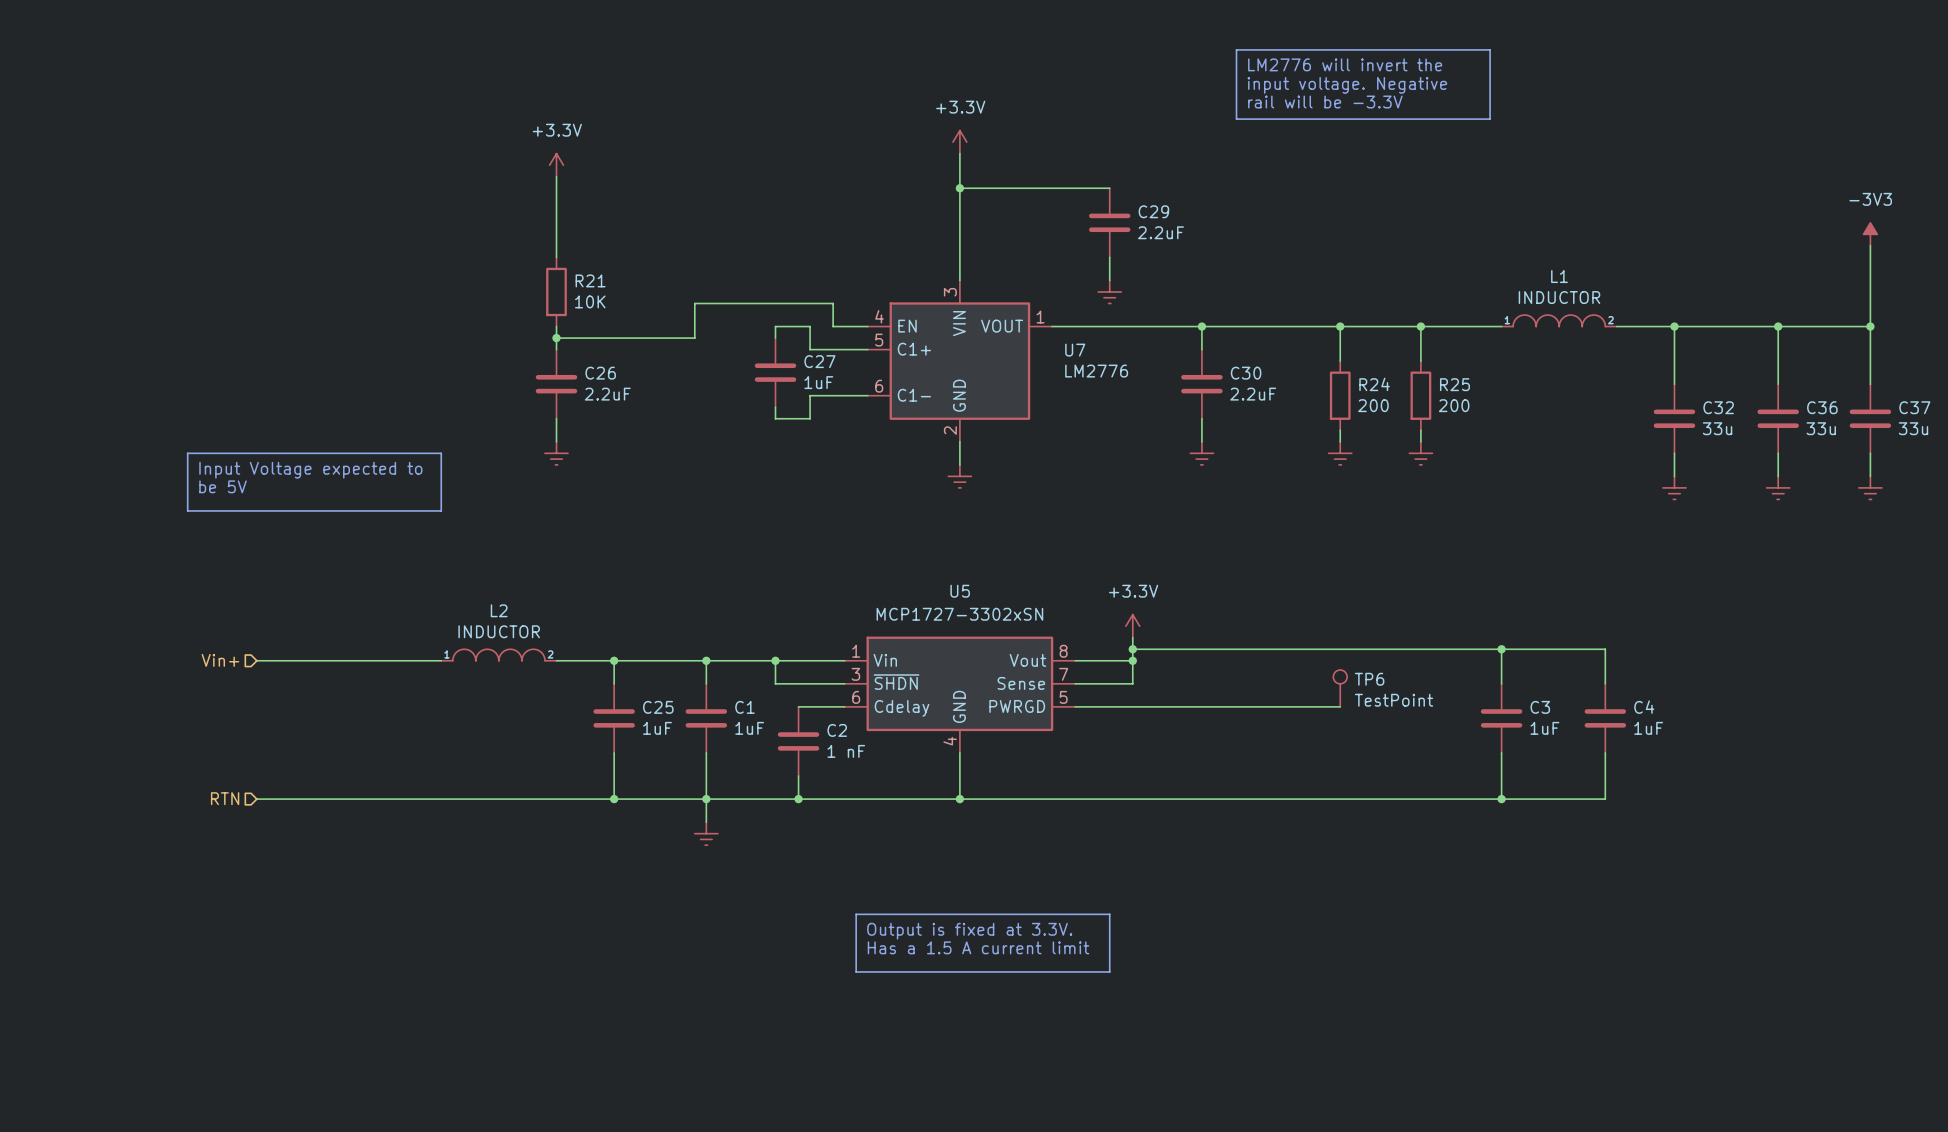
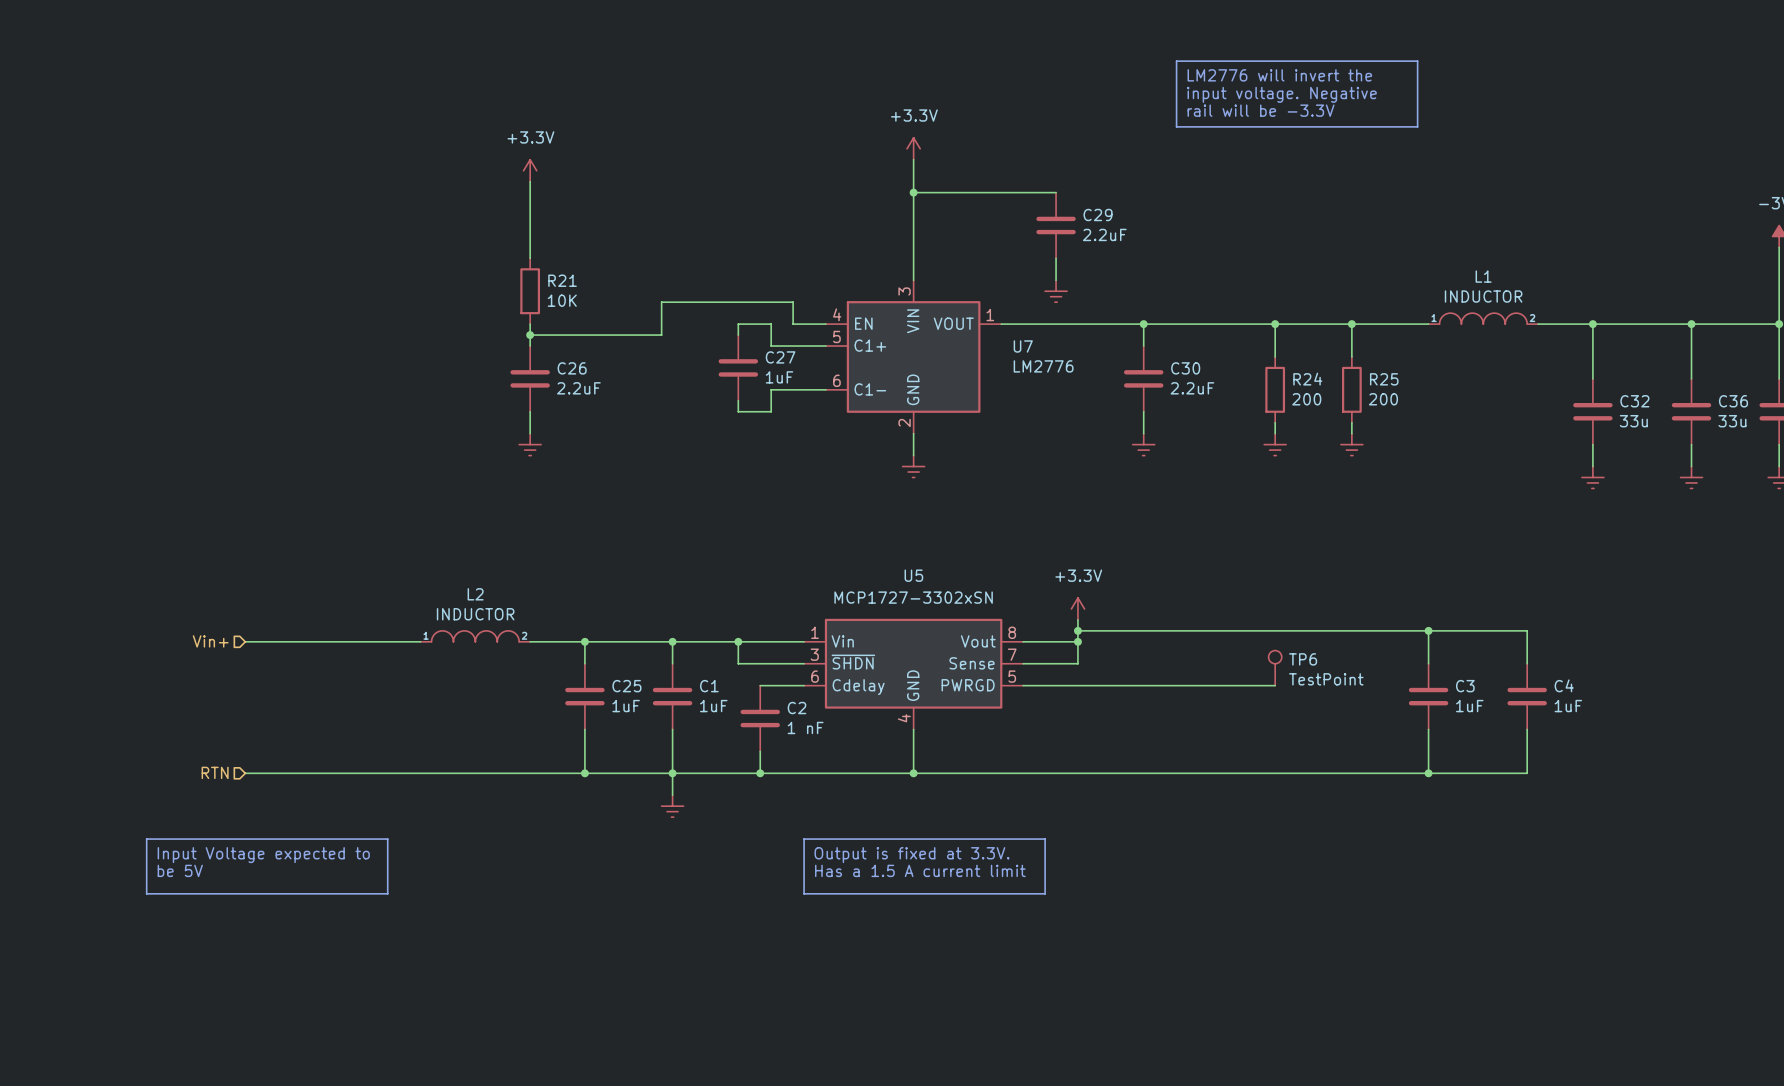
line: (187, 453) (441, 453) (441, 510) (187, 510) (187, 453) -> none
text: Input Voltage expected to (310, 470) -> none
text: be 5V (223, 486) -> none
line: none -> (146, 839) (387, 839) (387, 893) (146, 893) (146, 839)
text: none -> Input Voltage expected to (263, 855)
text: none -> be 5V (180, 870)
line: (856, 914) (1109, 914) (1109, 971) (856, 971) (856, 914) -> (804, 839) (1045, 839) (1045, 893) (804, 893) (804, 839)
text position: Output is fixed at 3.3V. (969, 931) -> Output is fixed at 3.3V. (912, 855)
text position: Has a 1.5 A current limit (978, 947) -> Has a 1.5 A current limit (920, 870)

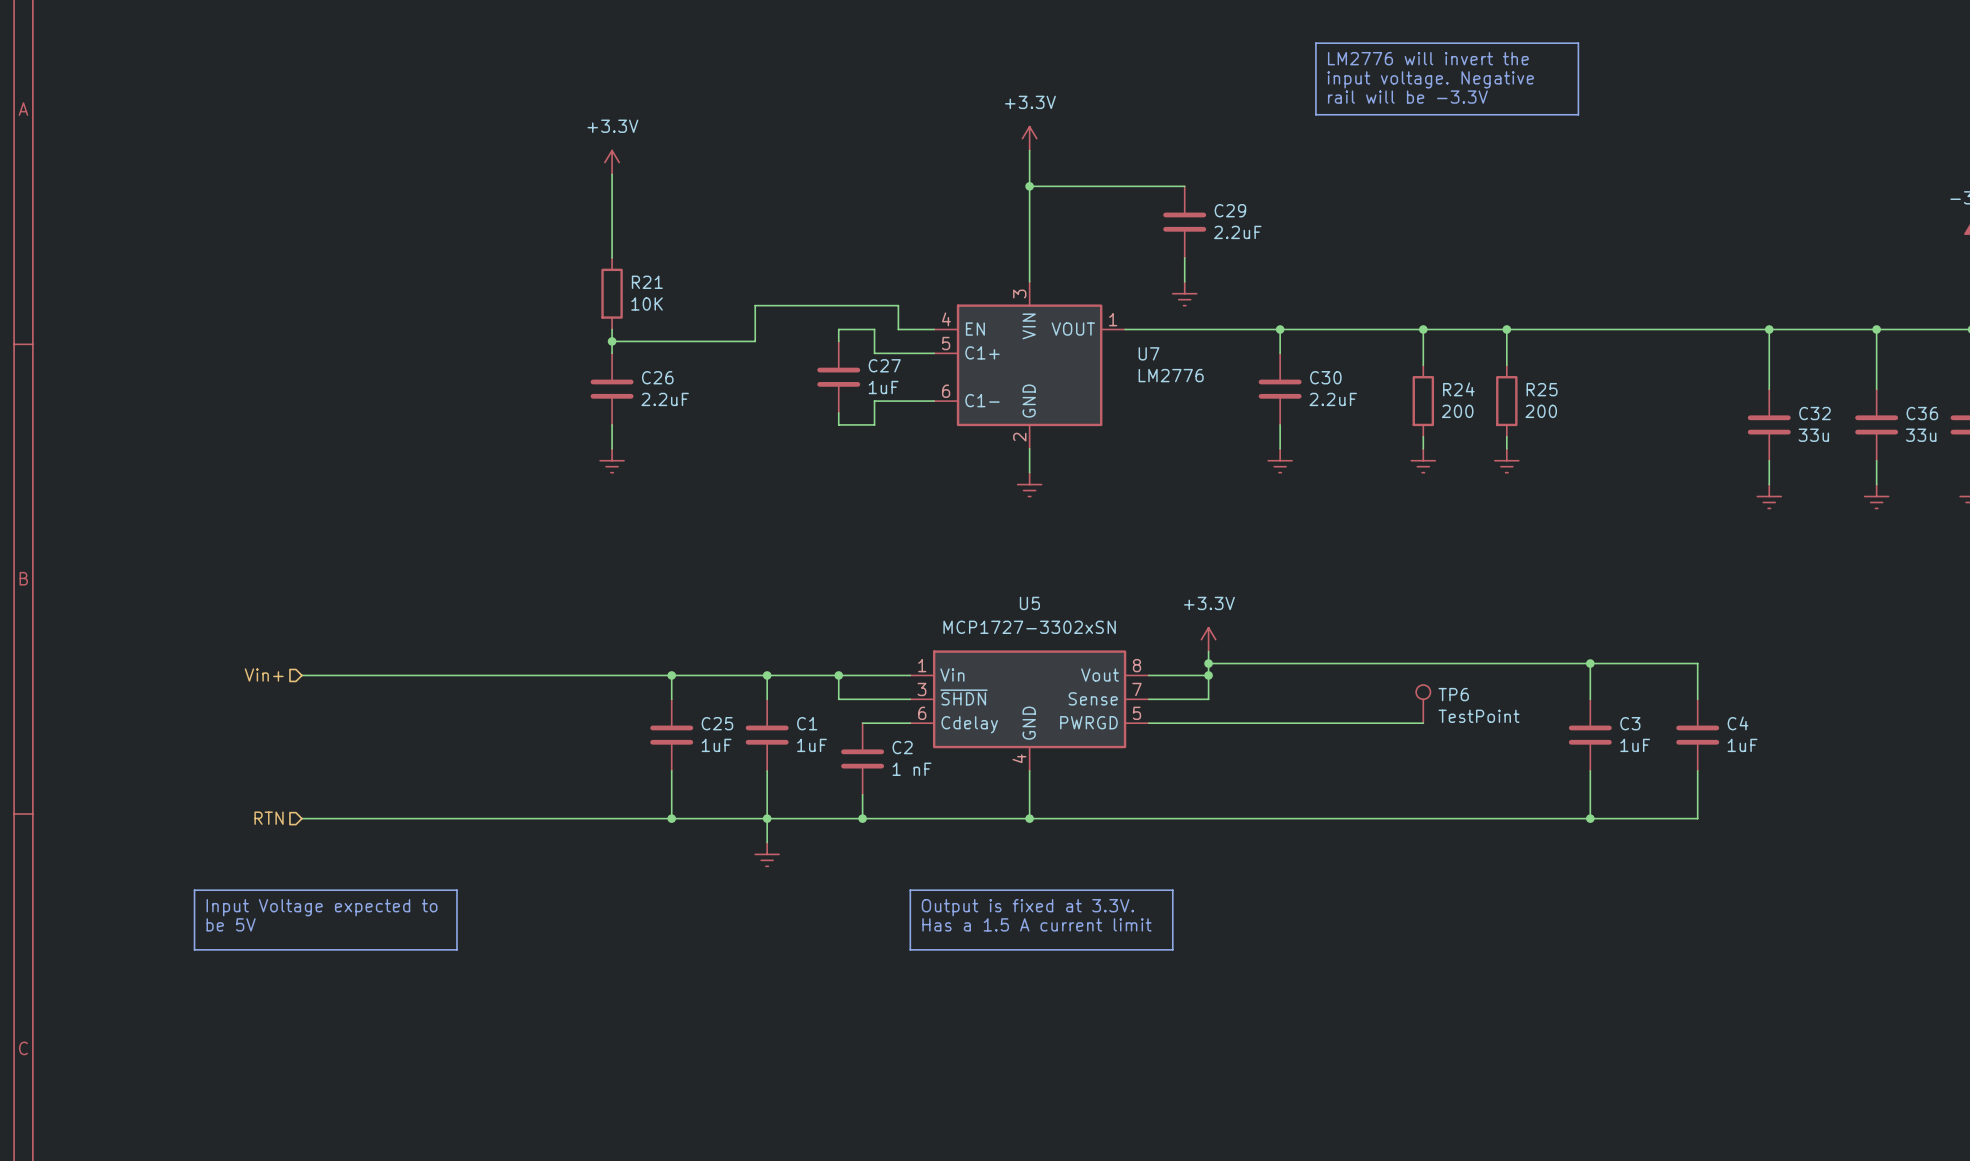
L1: INDUCTOR (1483, 318) -> none
wire: none -> (1590, 329) (1709, 329)
L2: INDUCTOR (475, 636) -> none
wire: none -> (492, 675) (612, 675)

